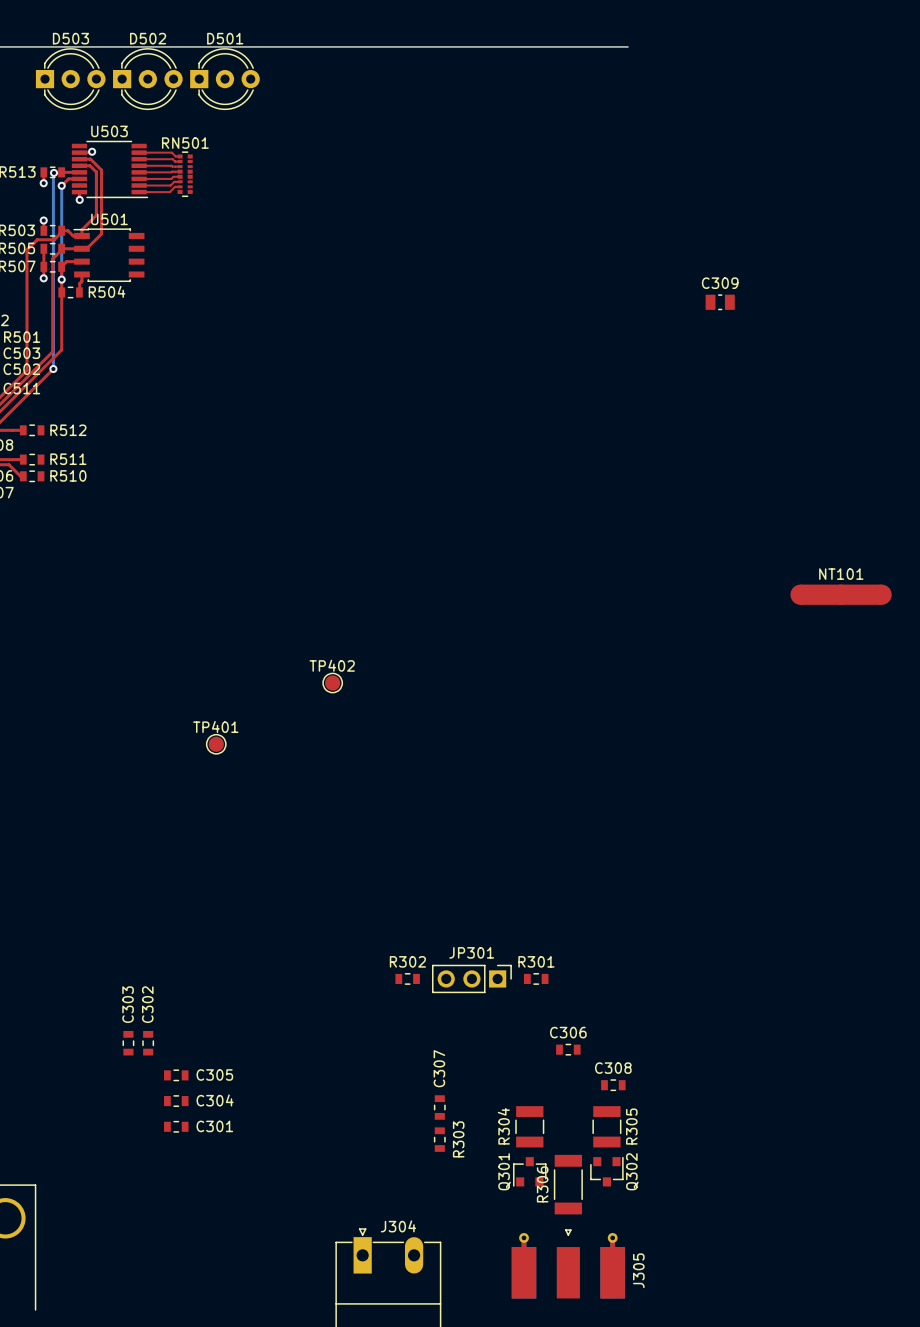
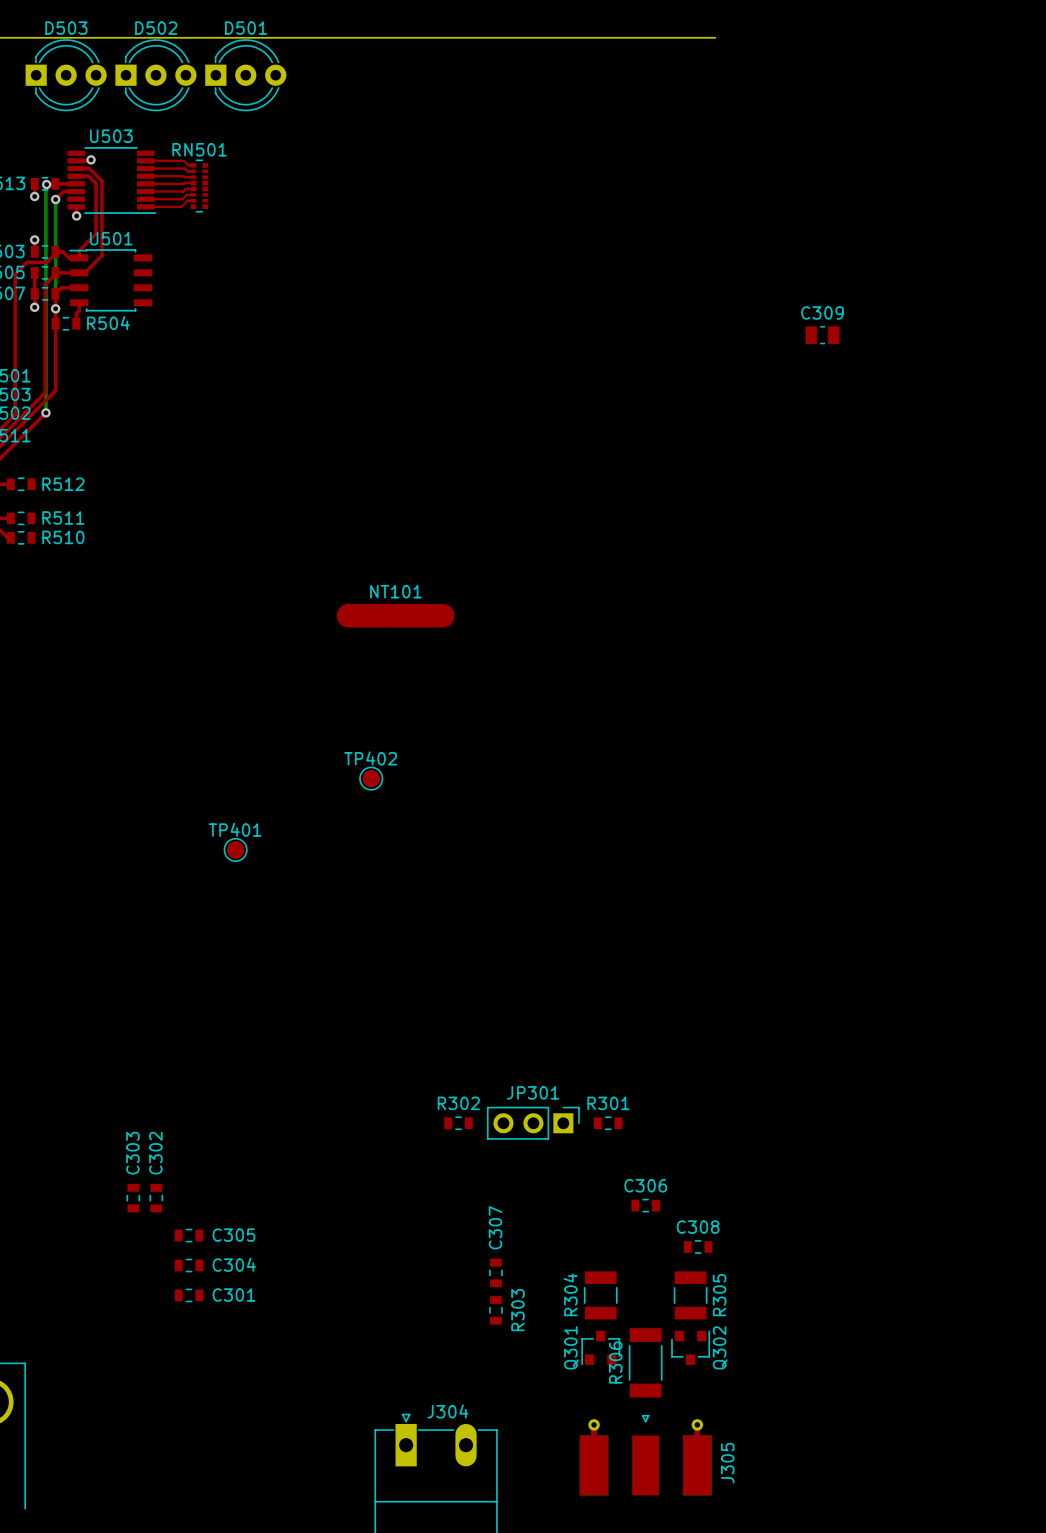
NT101 position: (841, 594) -> (395, 615)

